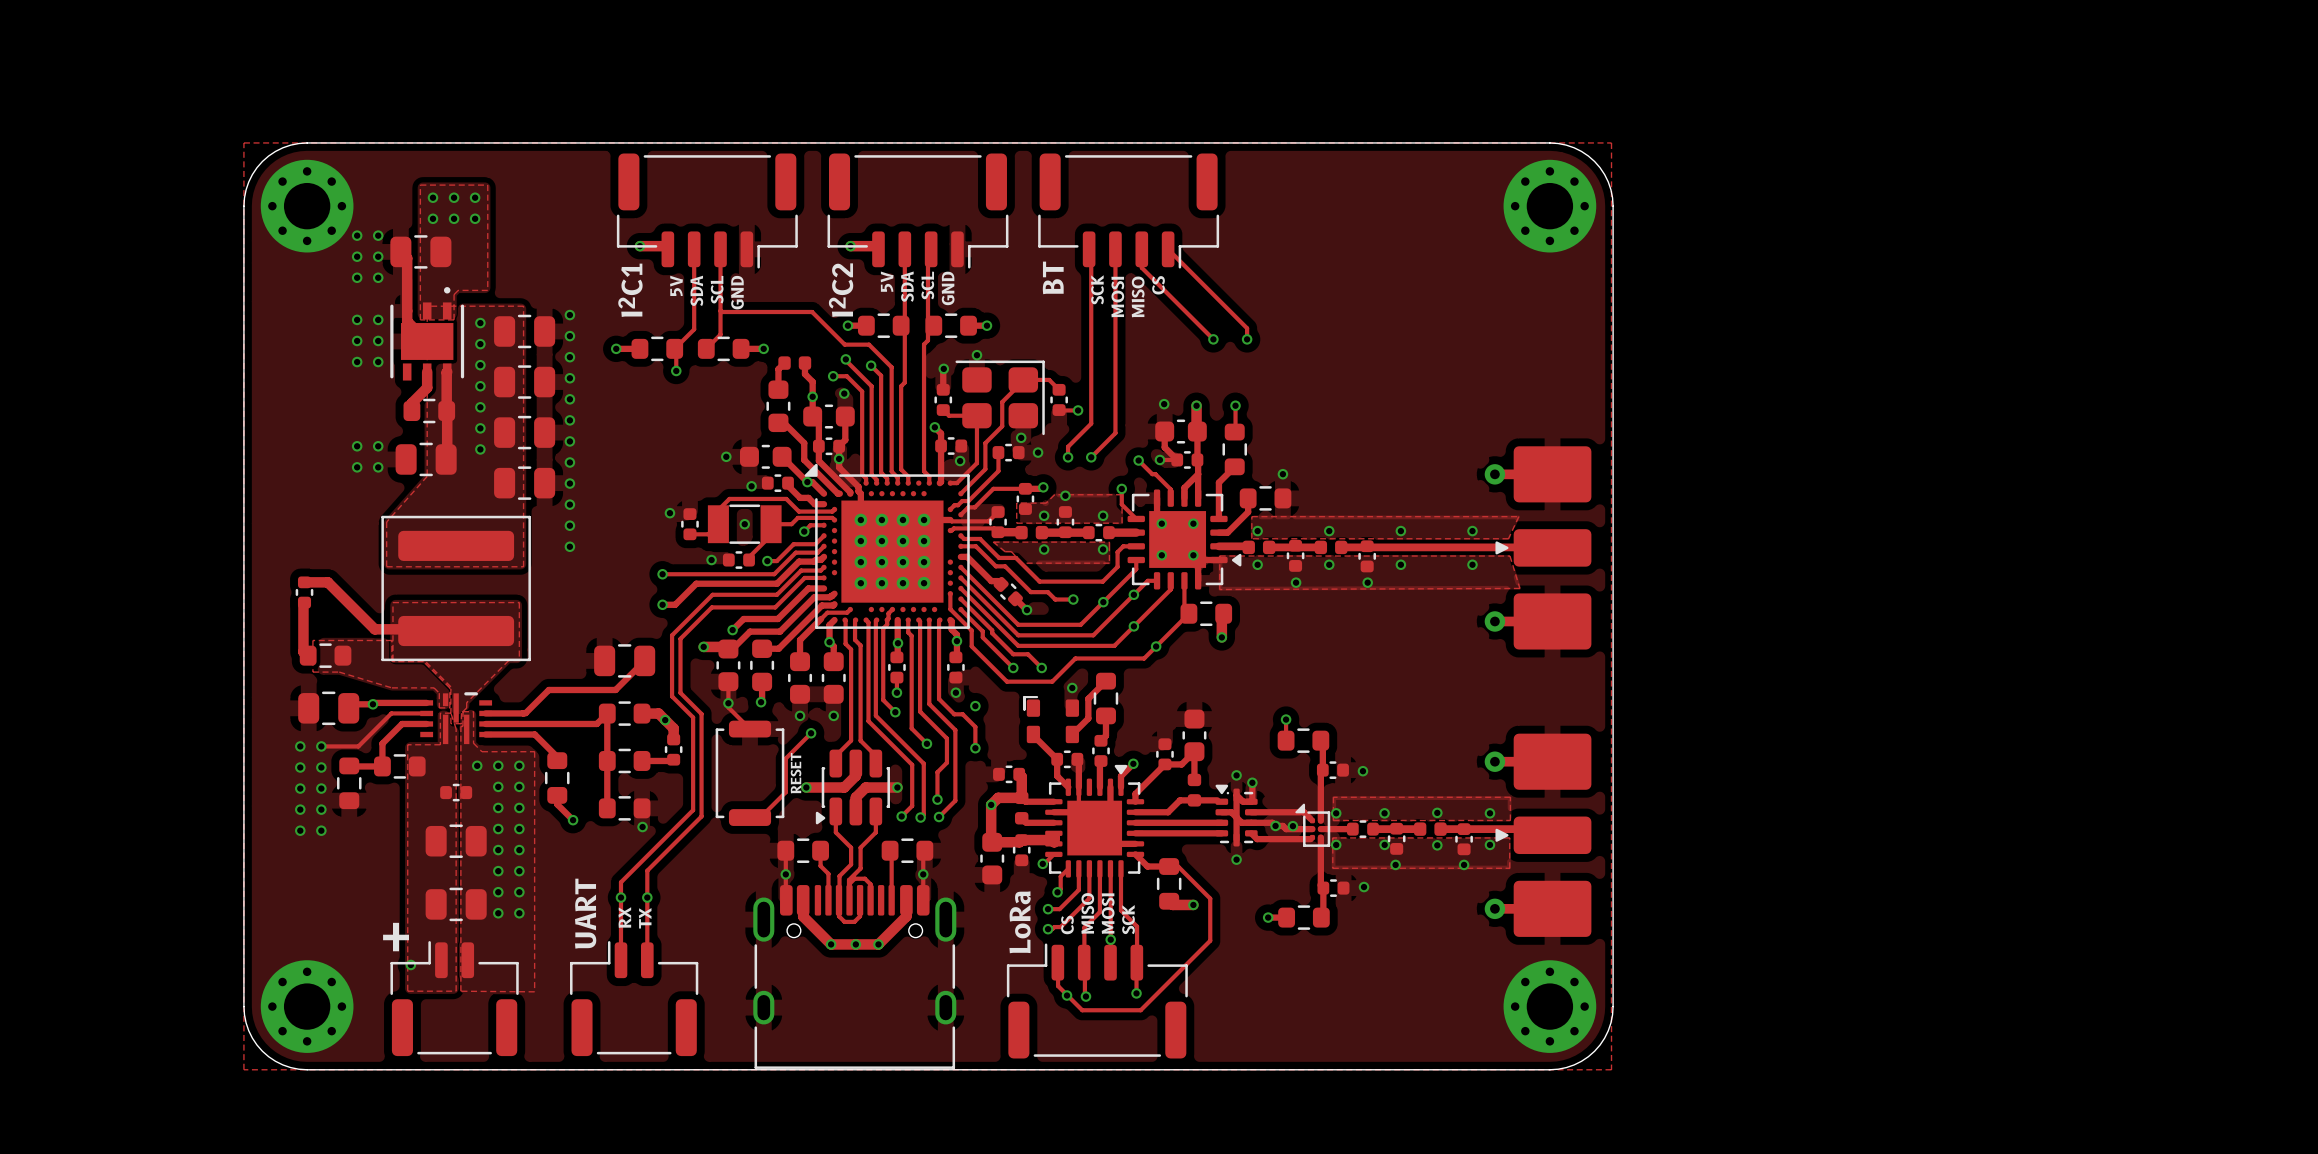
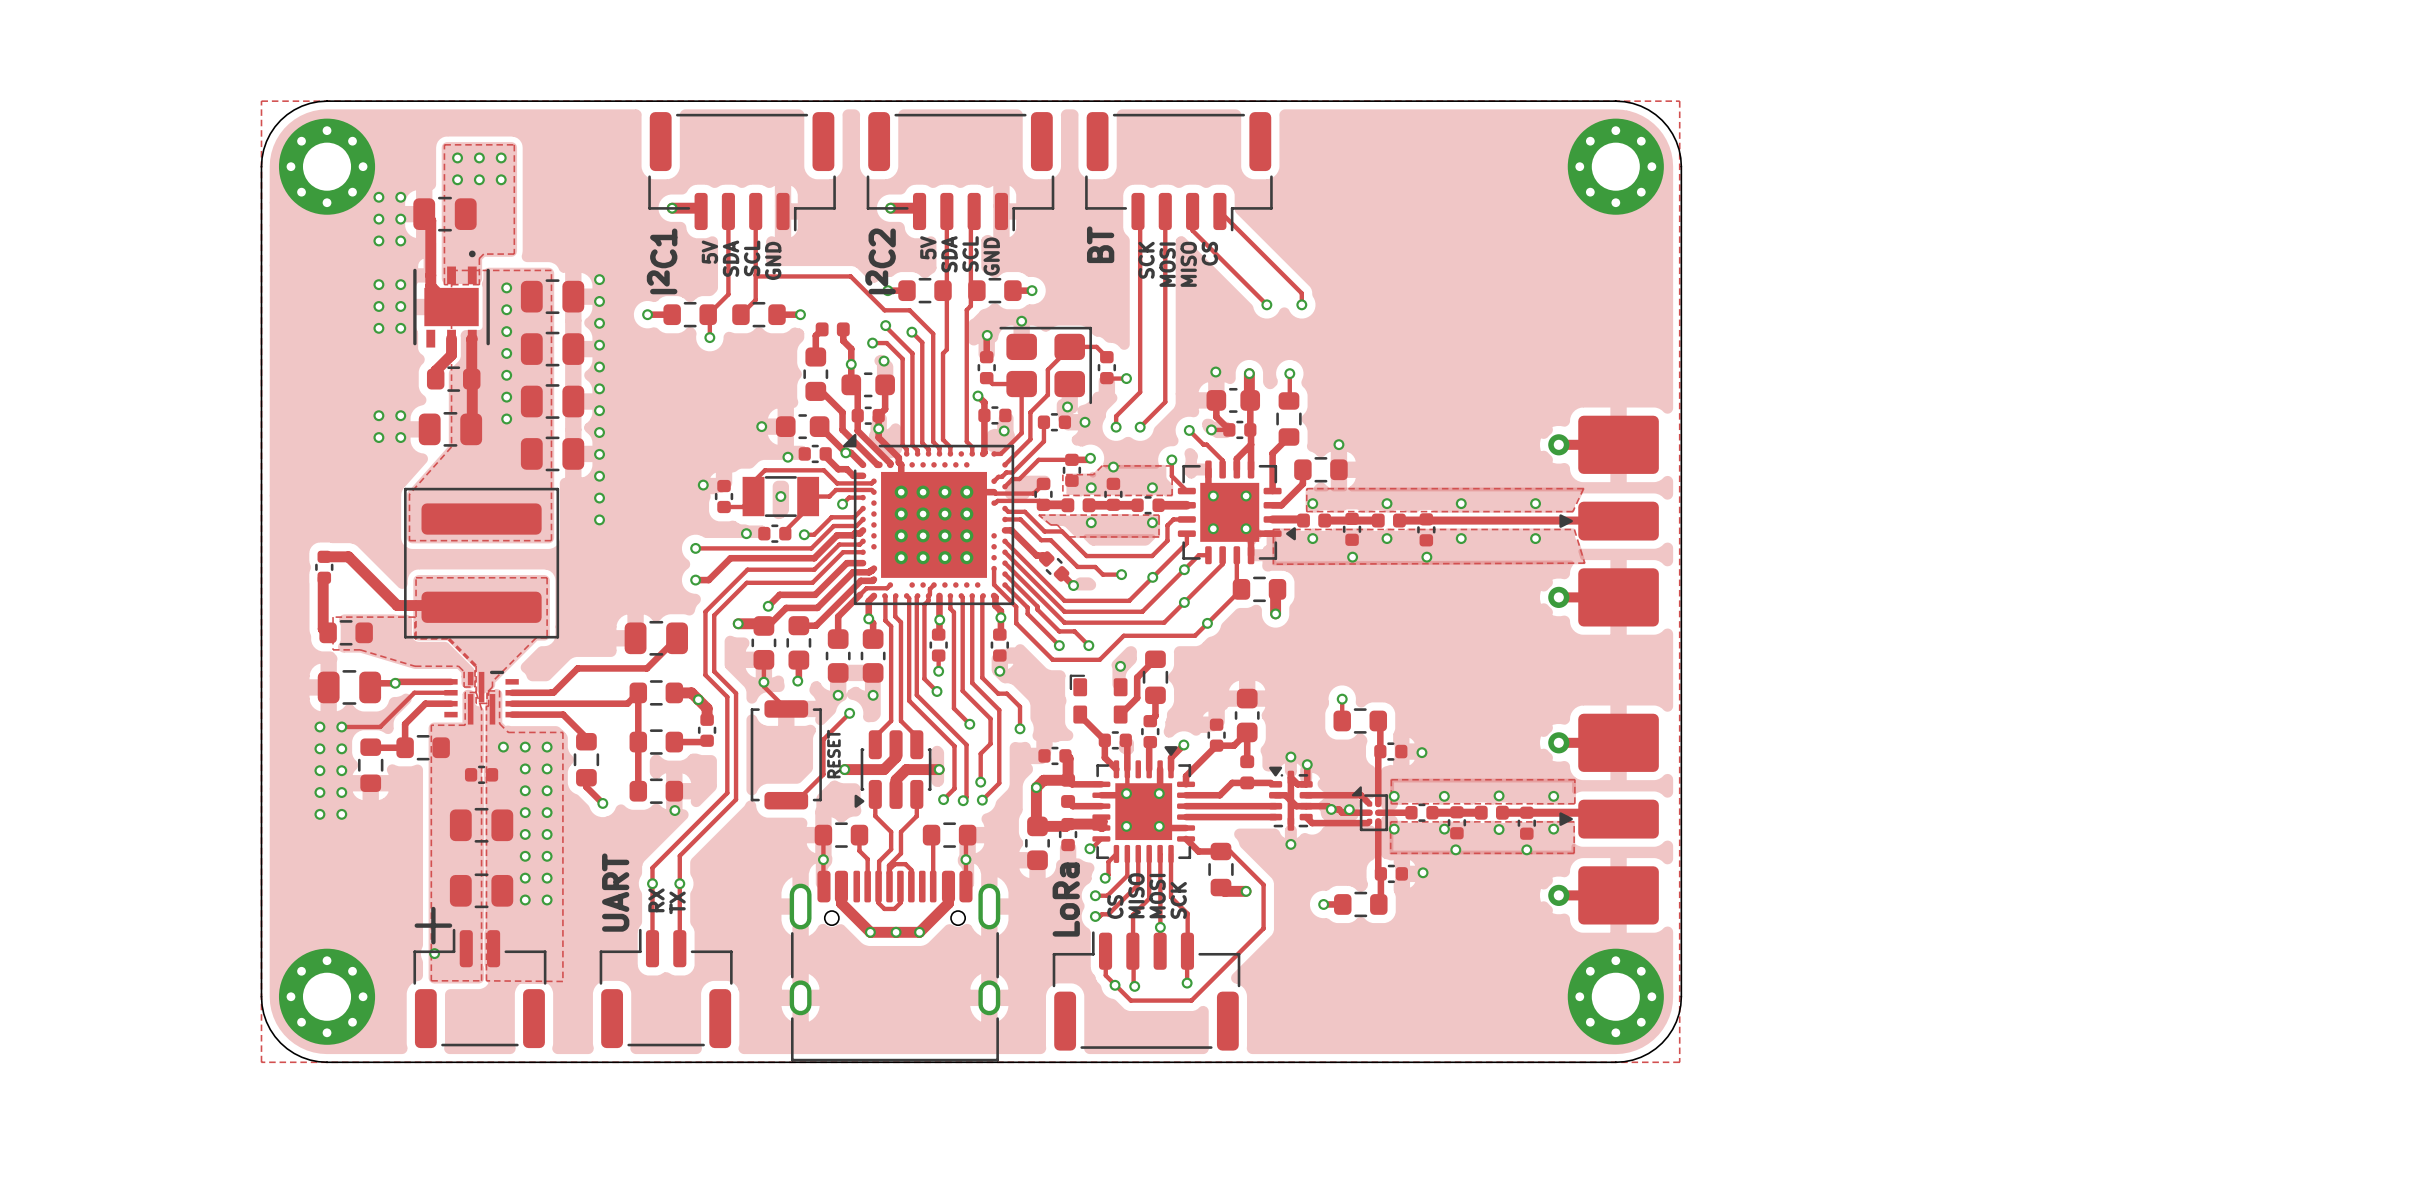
via: (975, 706) -> none
via: none -> (1126, 793)
via: none -> (1159, 793)
via: none -> (1126, 826)
via: none -> (1159, 826)

